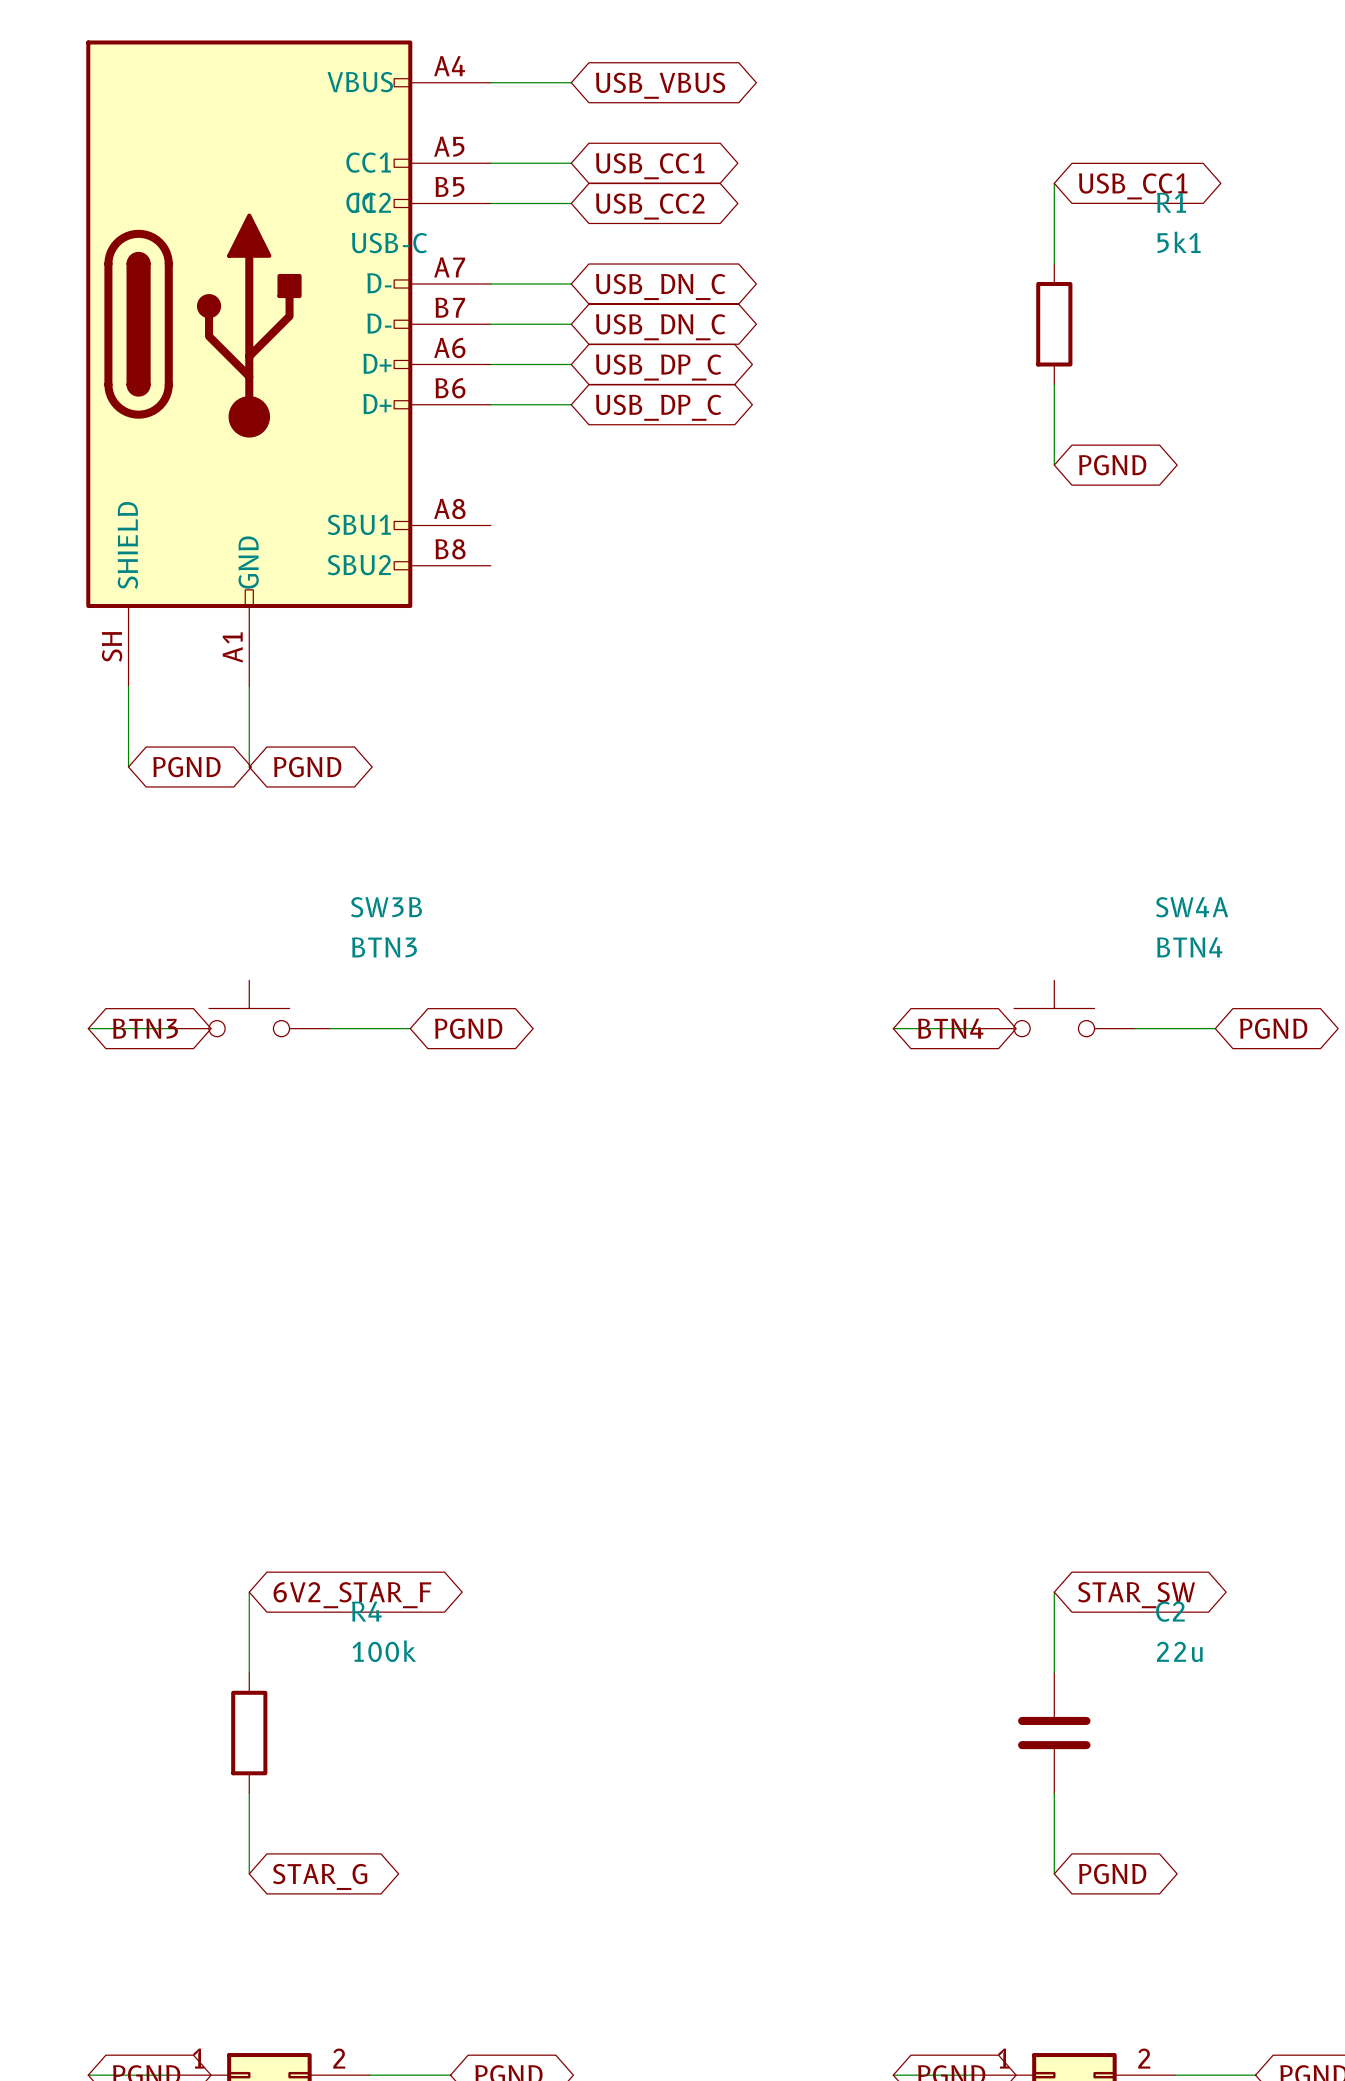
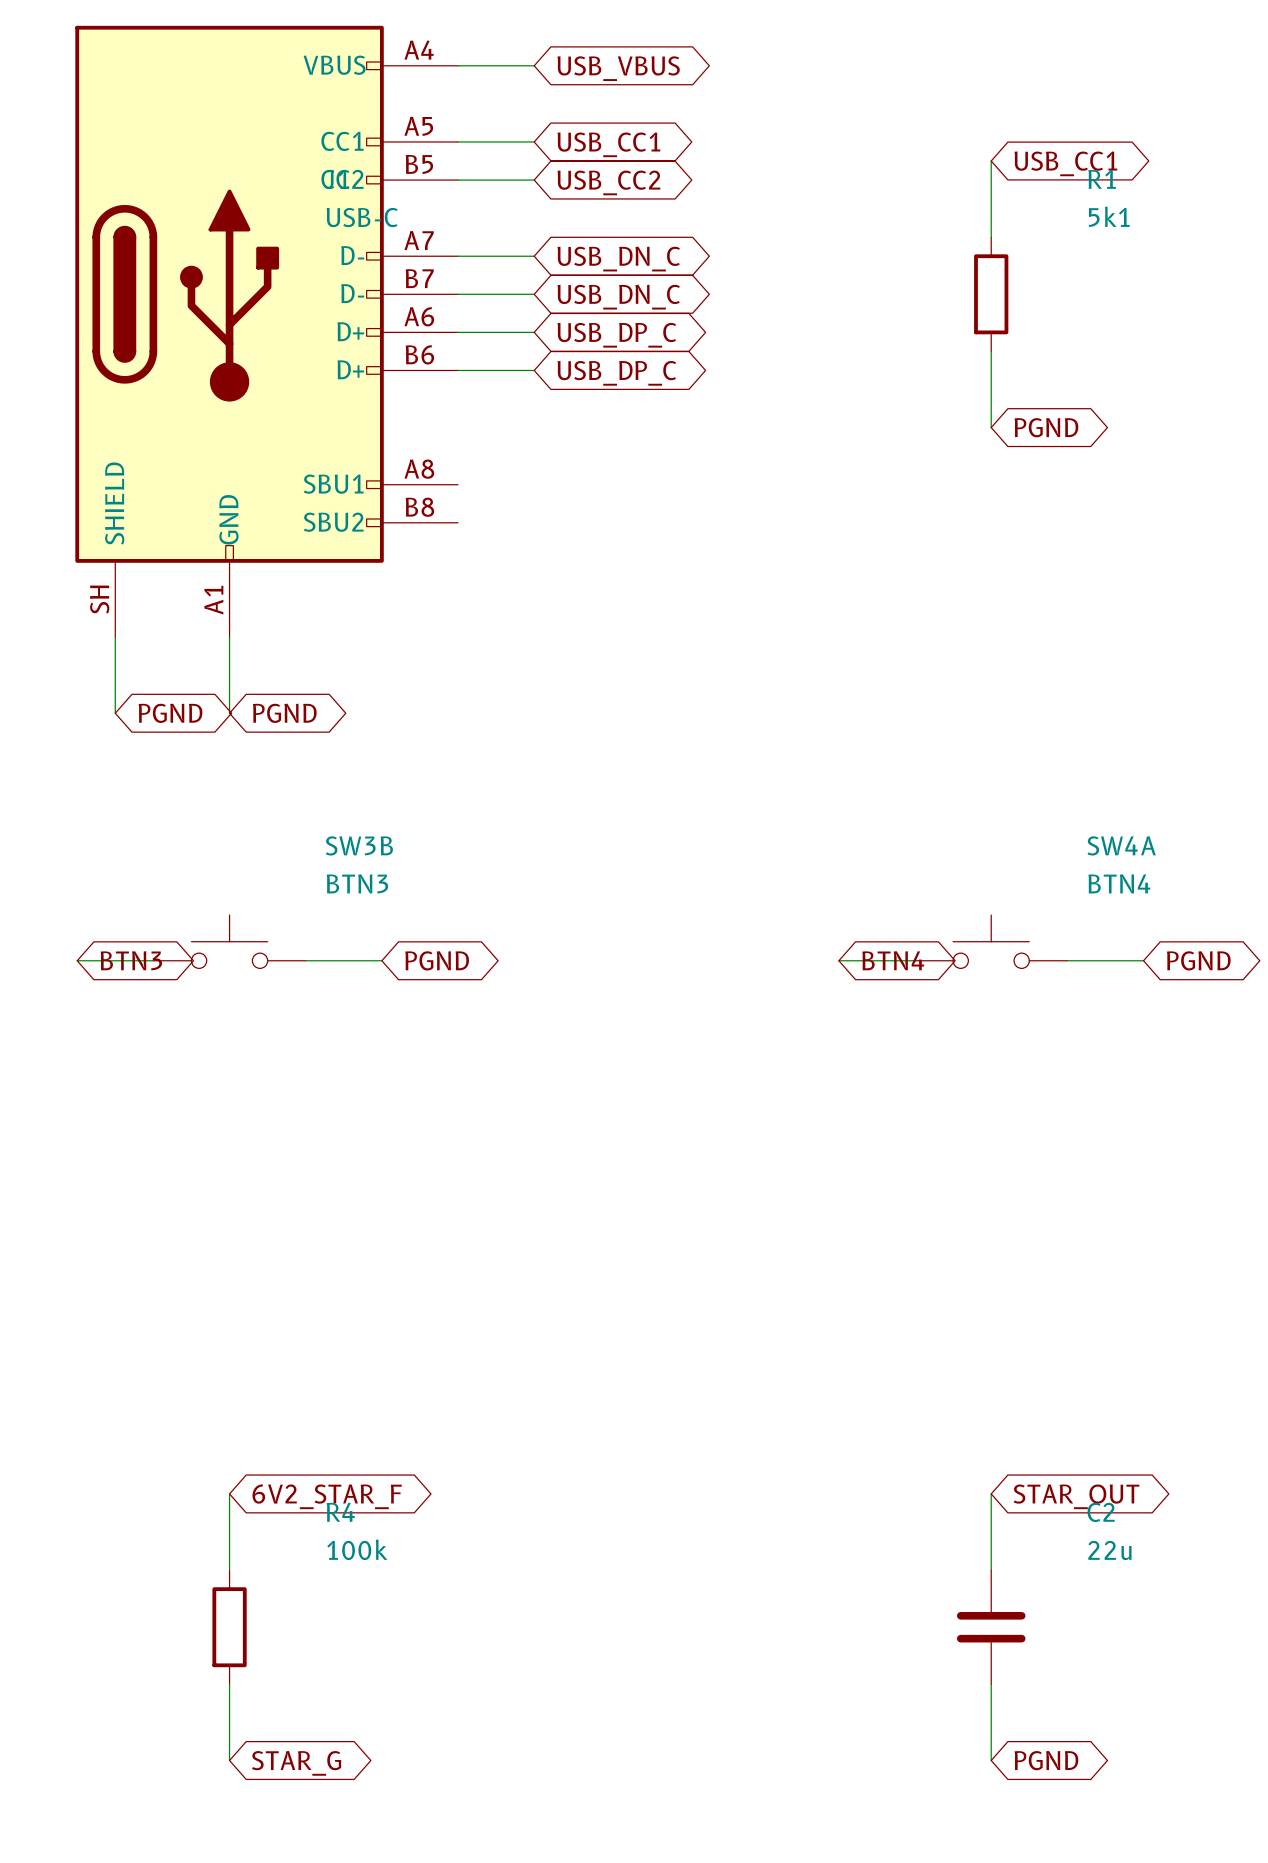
global label: STAR_SW (1136, 1595) -> STAR_OUT (1076, 1496)

